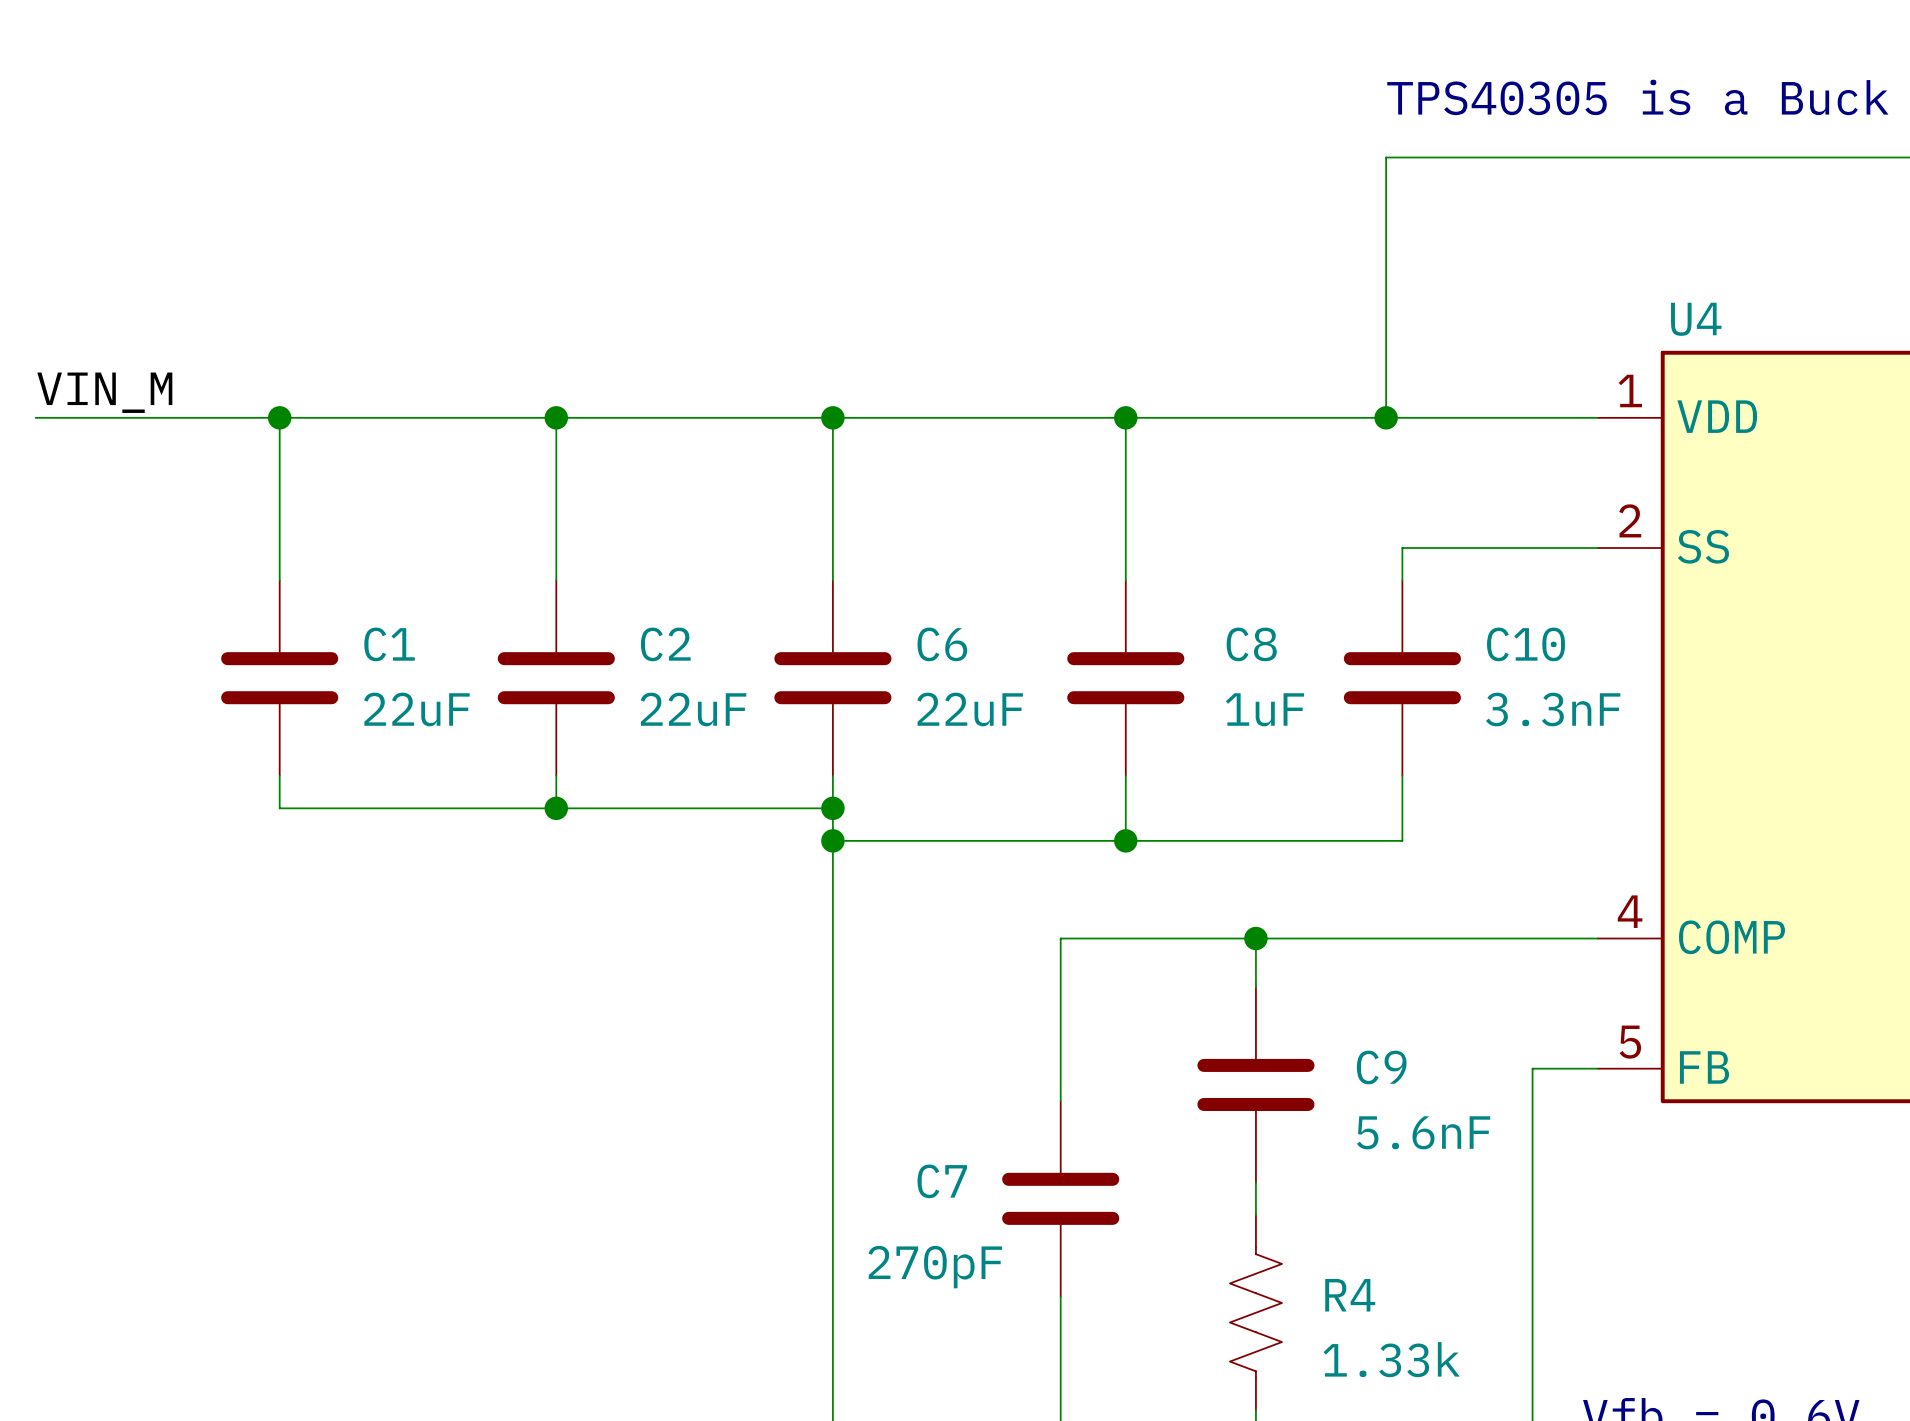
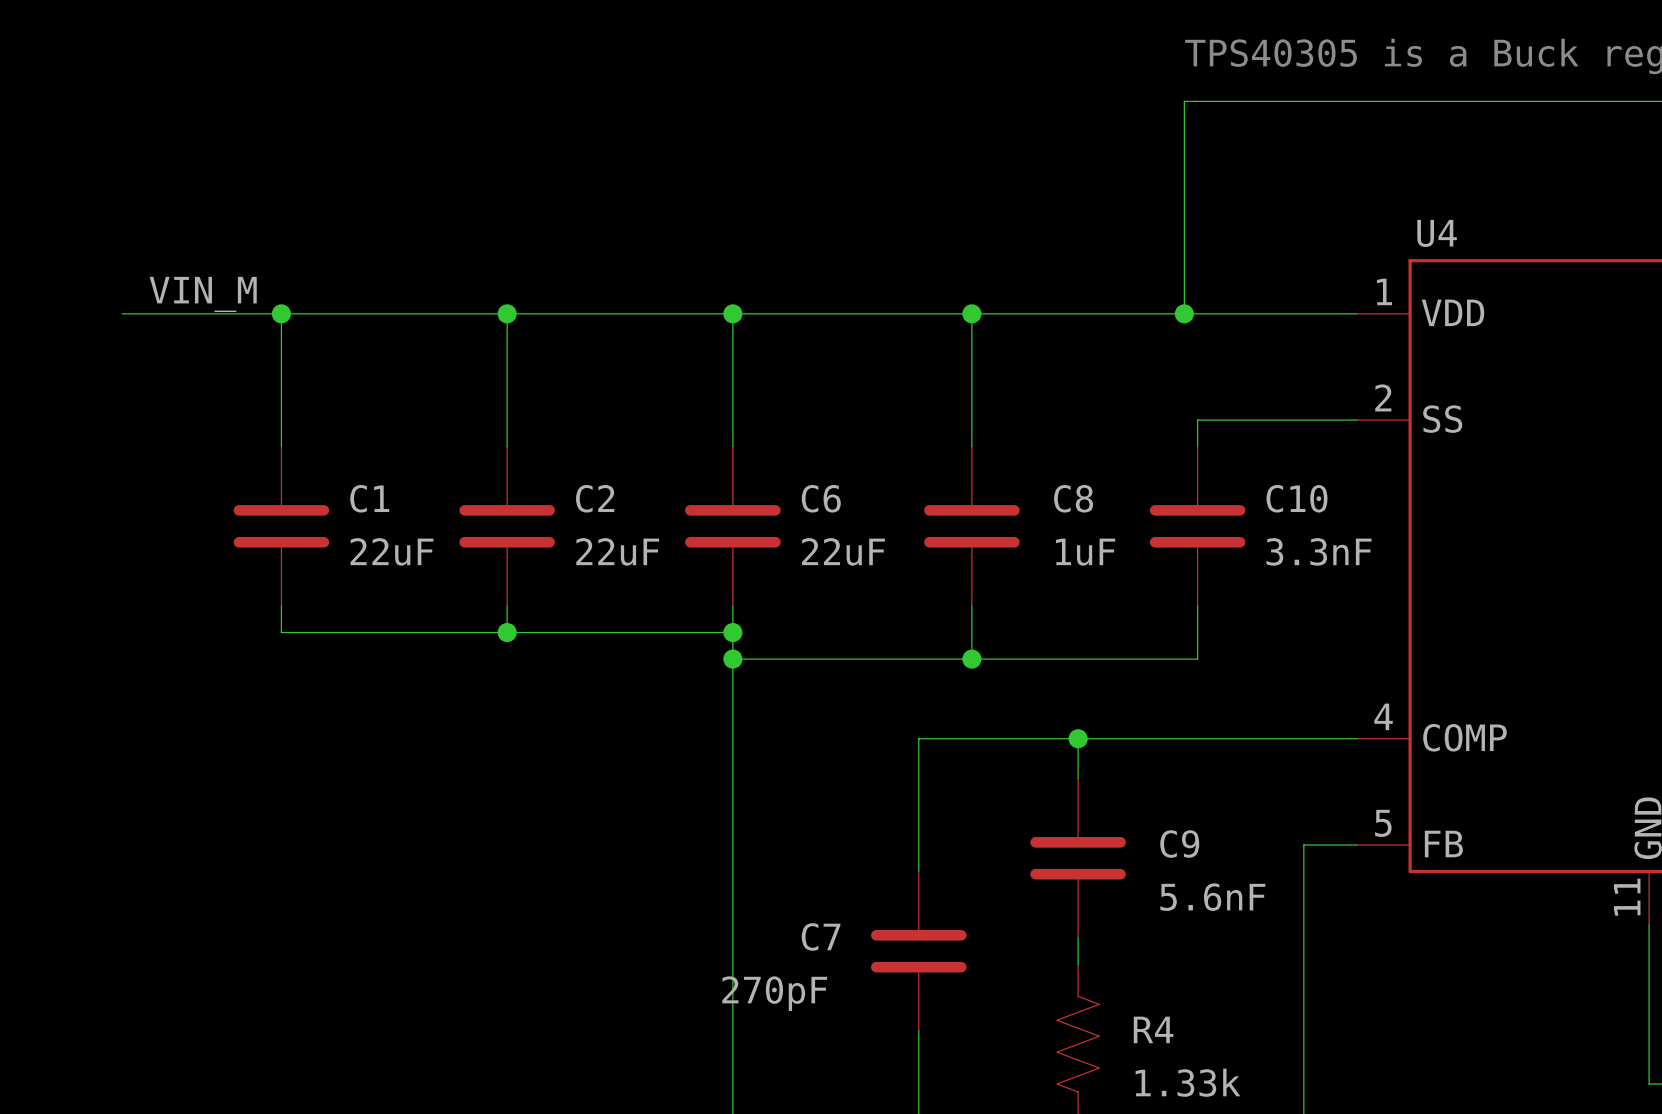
label position: VIN_M (104, 392) -> VIN_M (203, 294)
wire: (35, 417) (84, 417) -> none
C7 value position: 270pF (935, 1267) -> 270pF (774, 993)

